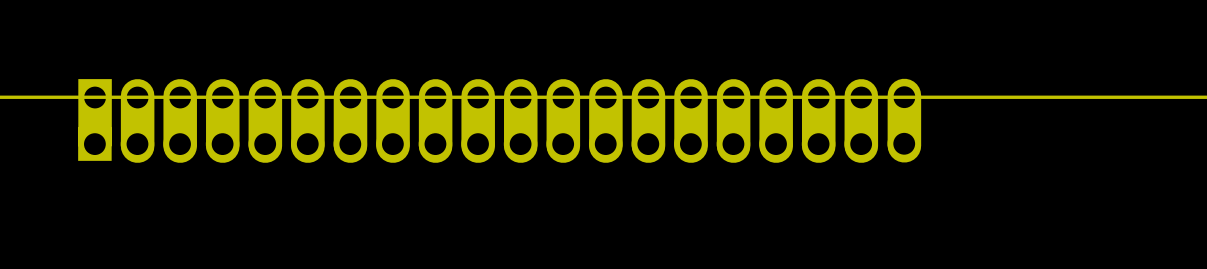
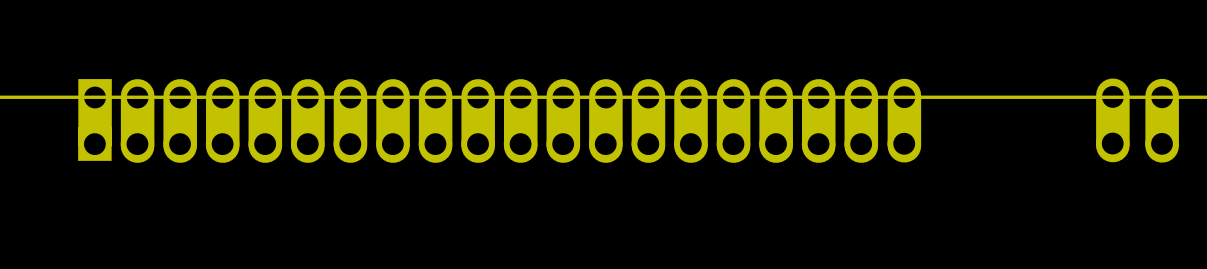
part: none -> (1112, 120)
part: none -> (1162, 120)

